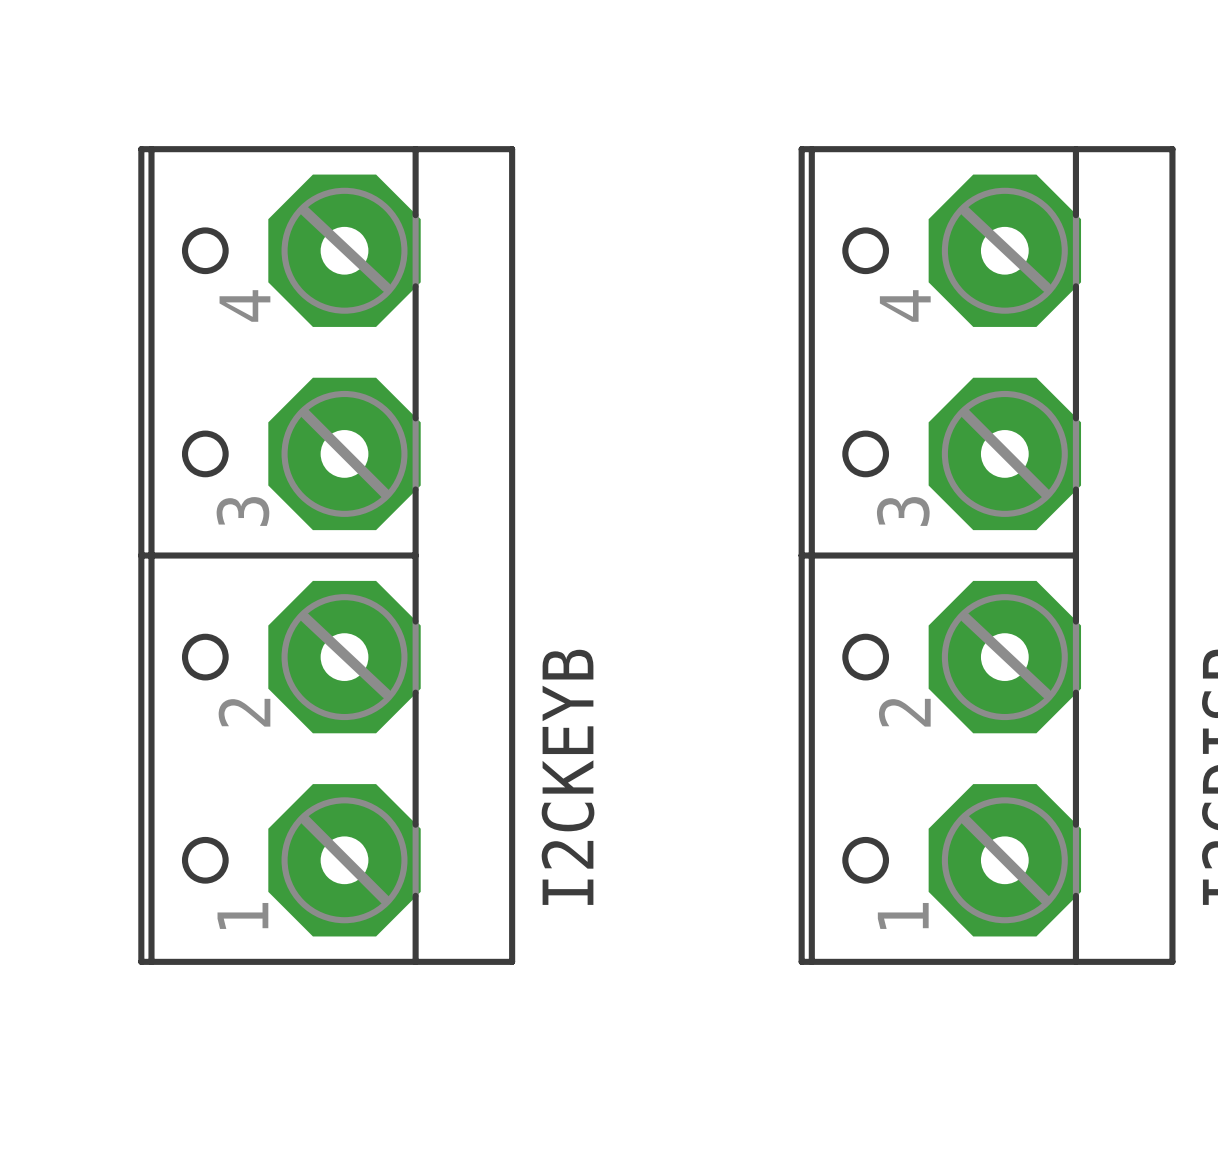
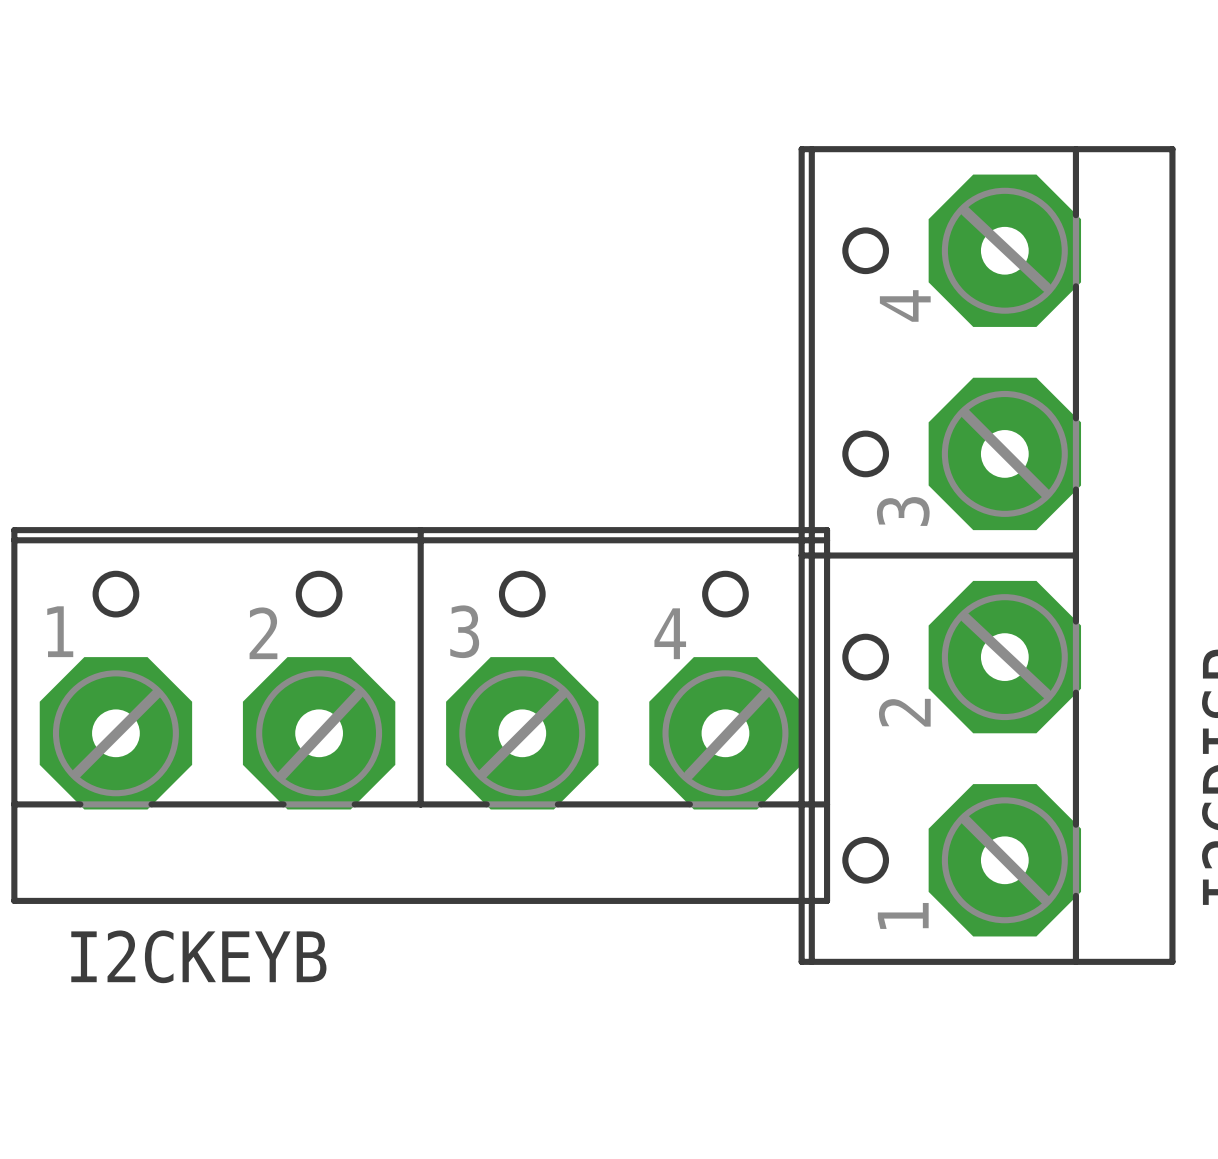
I2CKEYB rotation: 0° (326, 555) -> 90° clockwise (420, 715)

